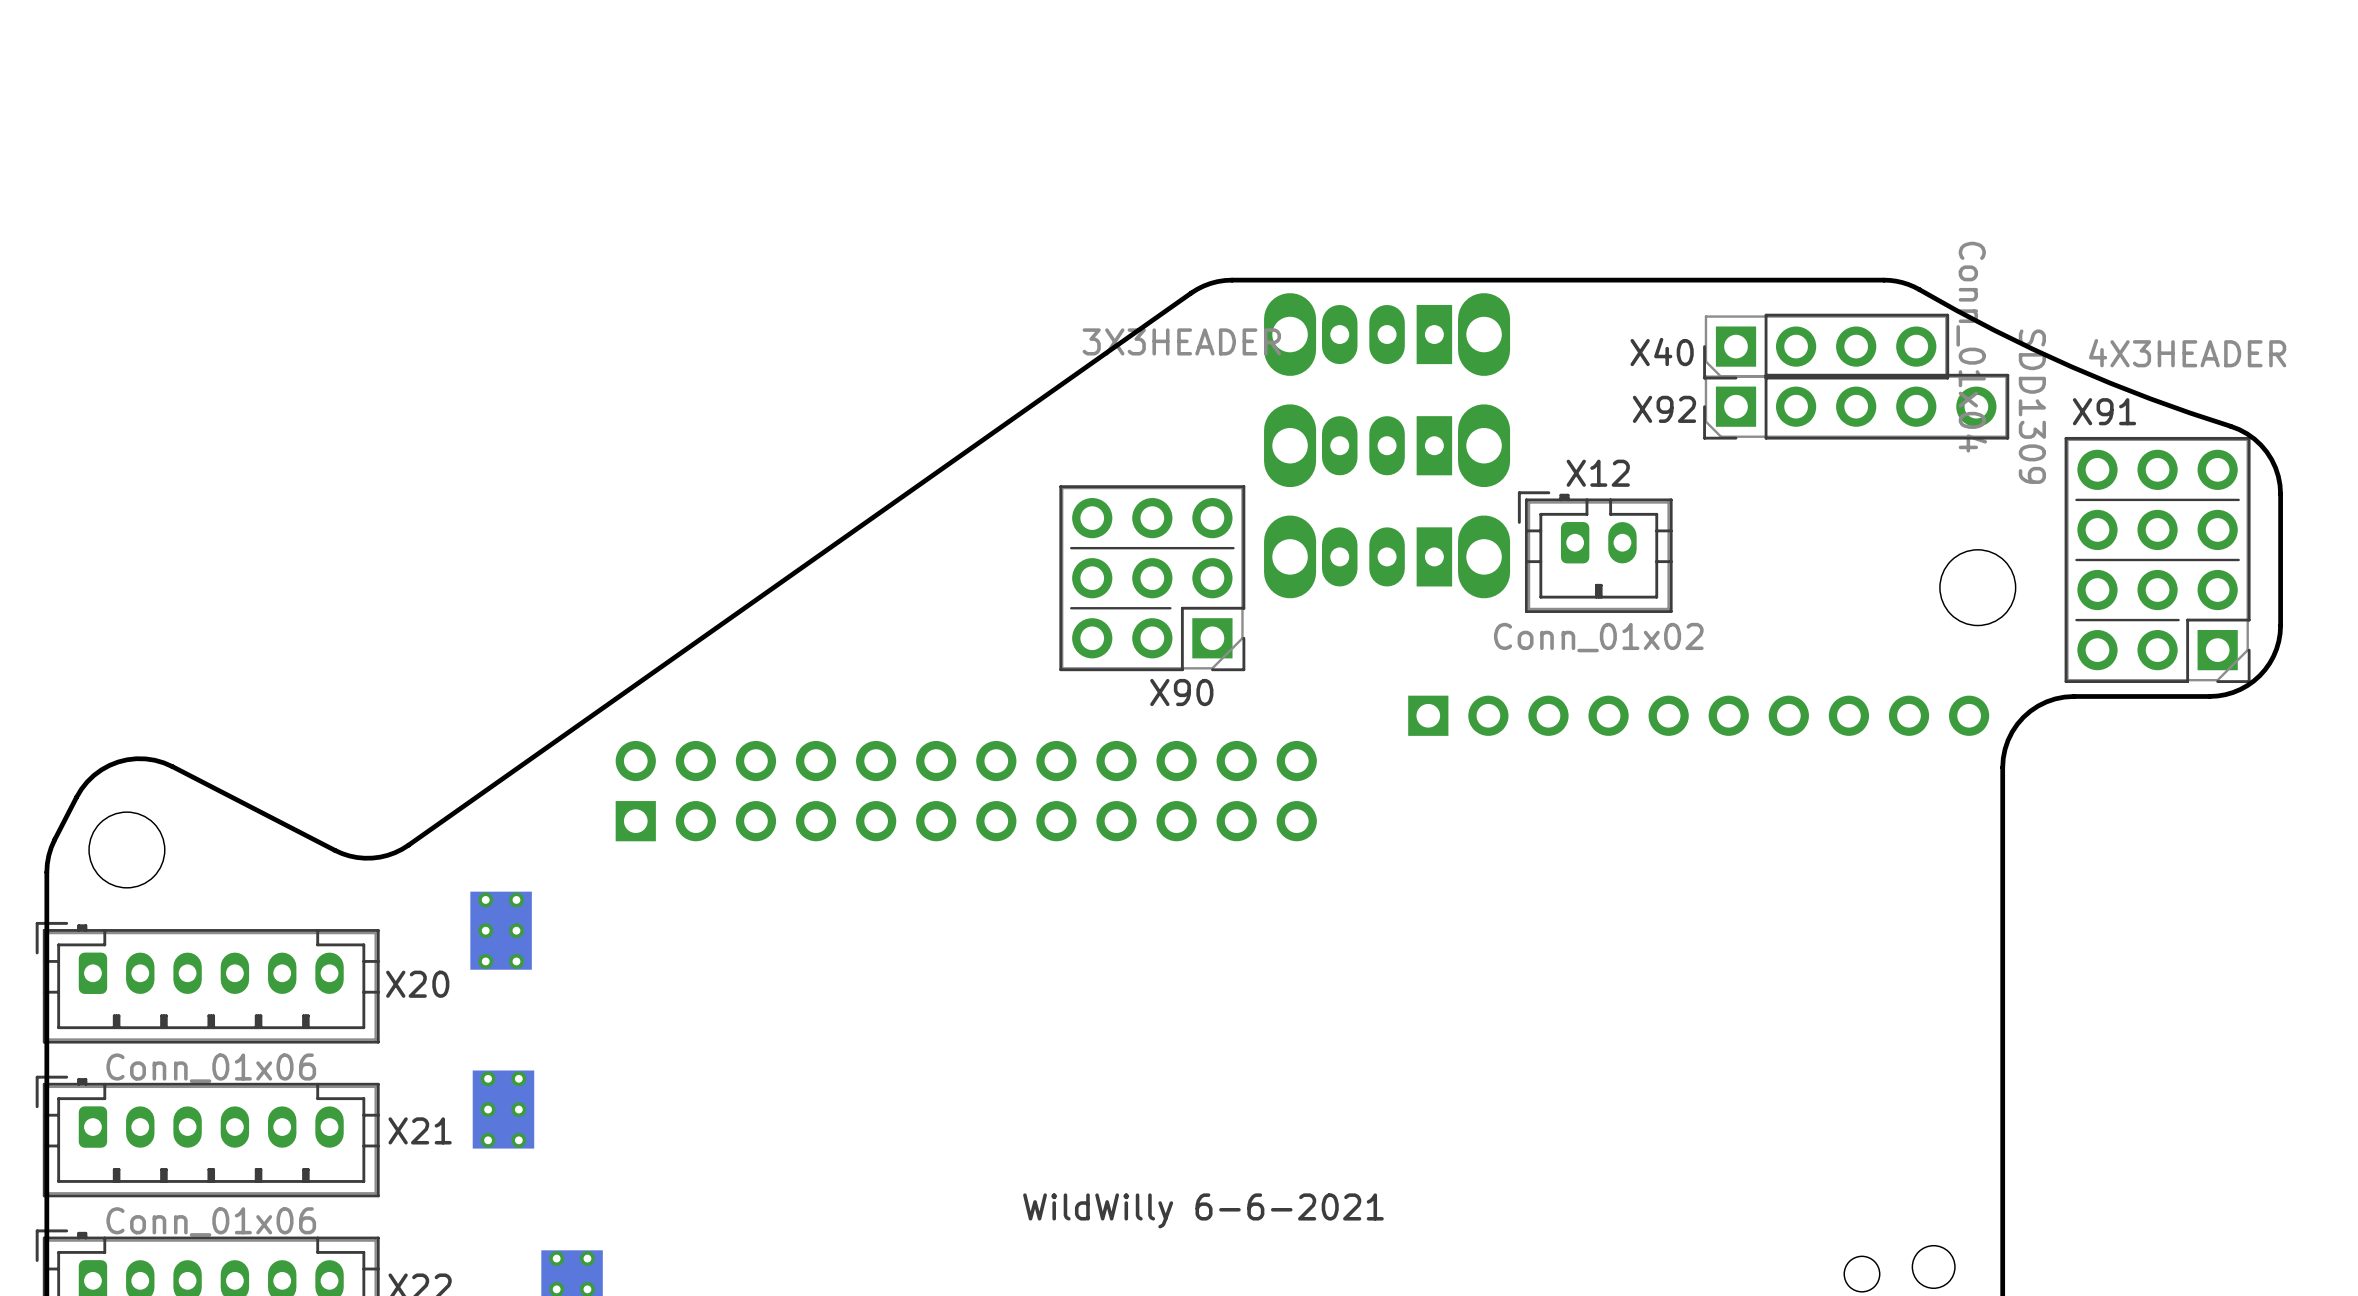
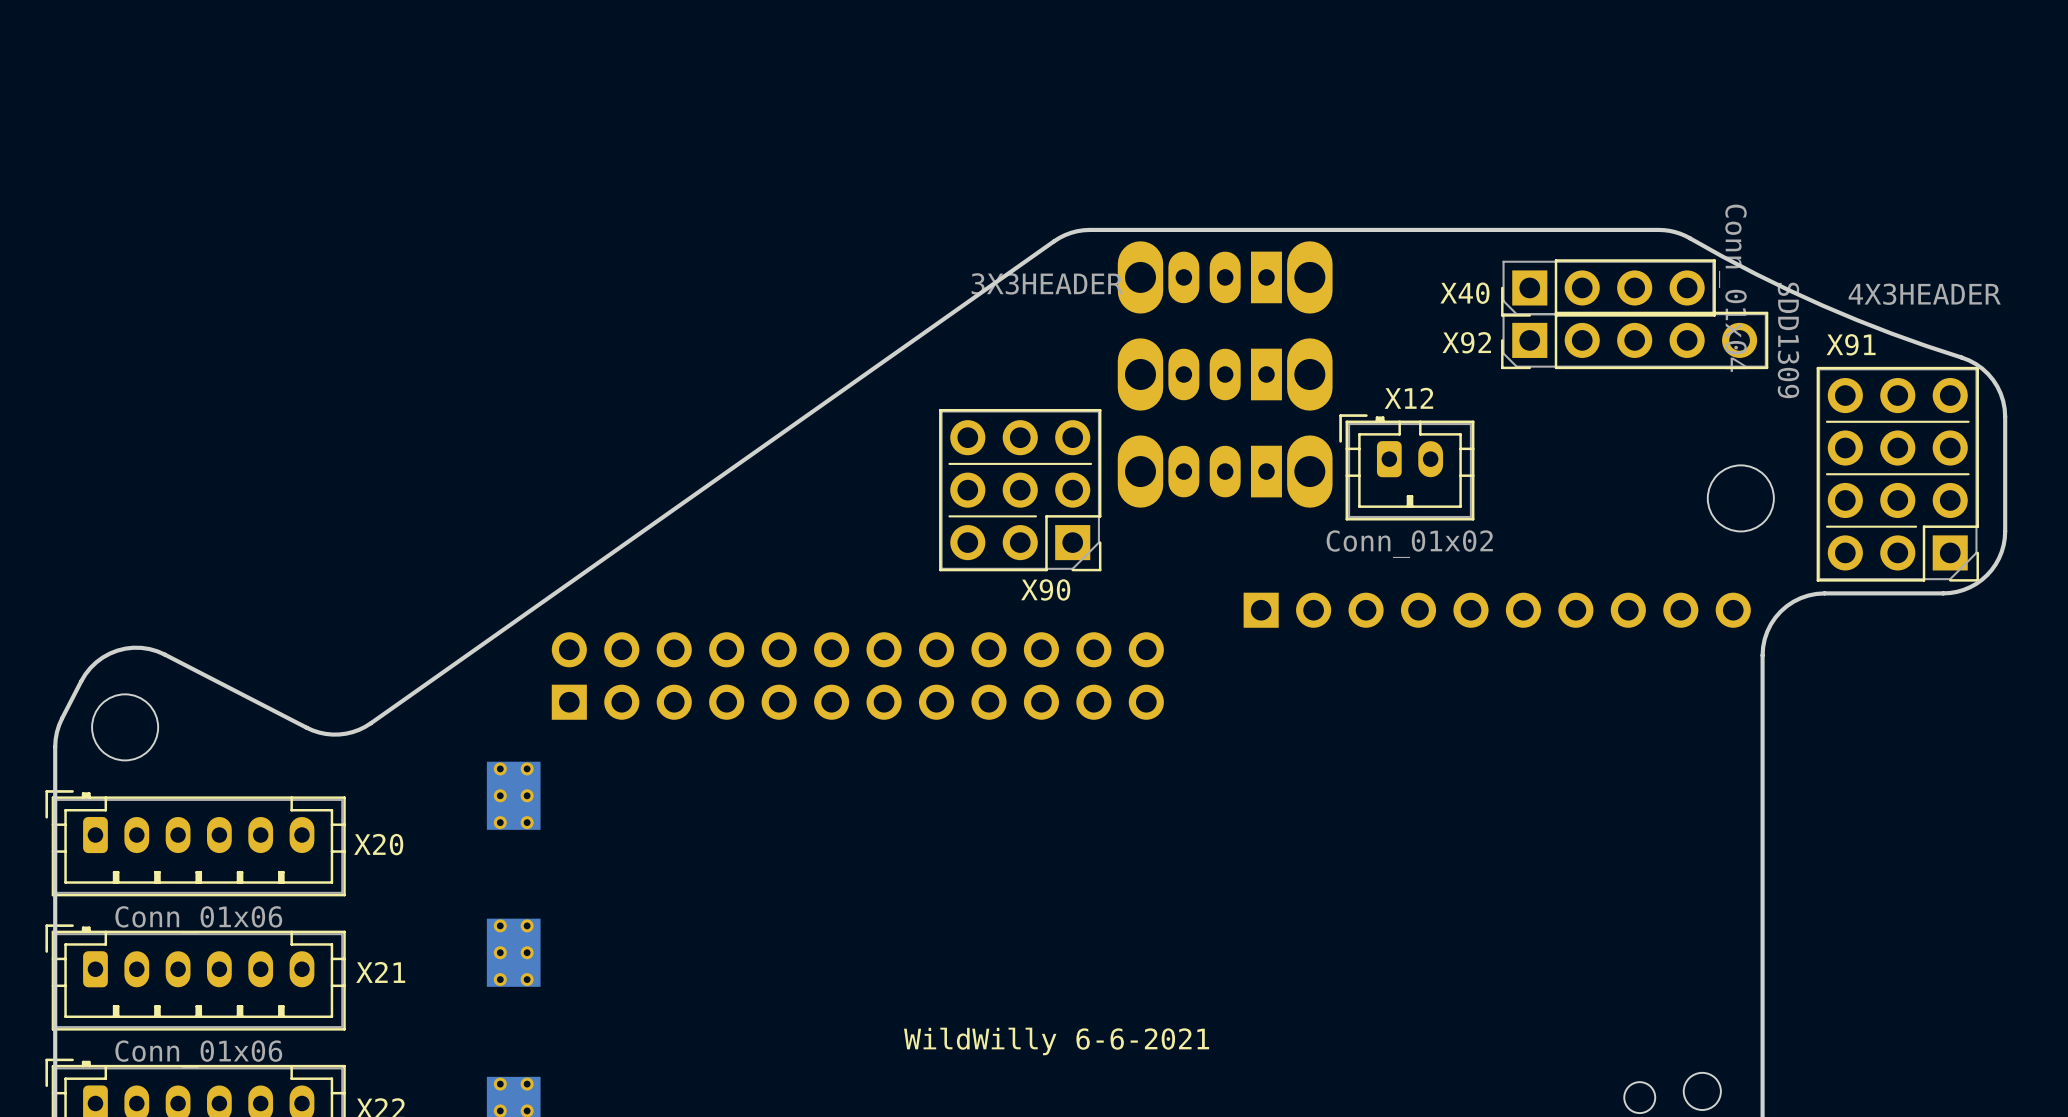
part position: (501, 930) -> (513, 795)
part position: (503, 1109) -> (513, 952)

